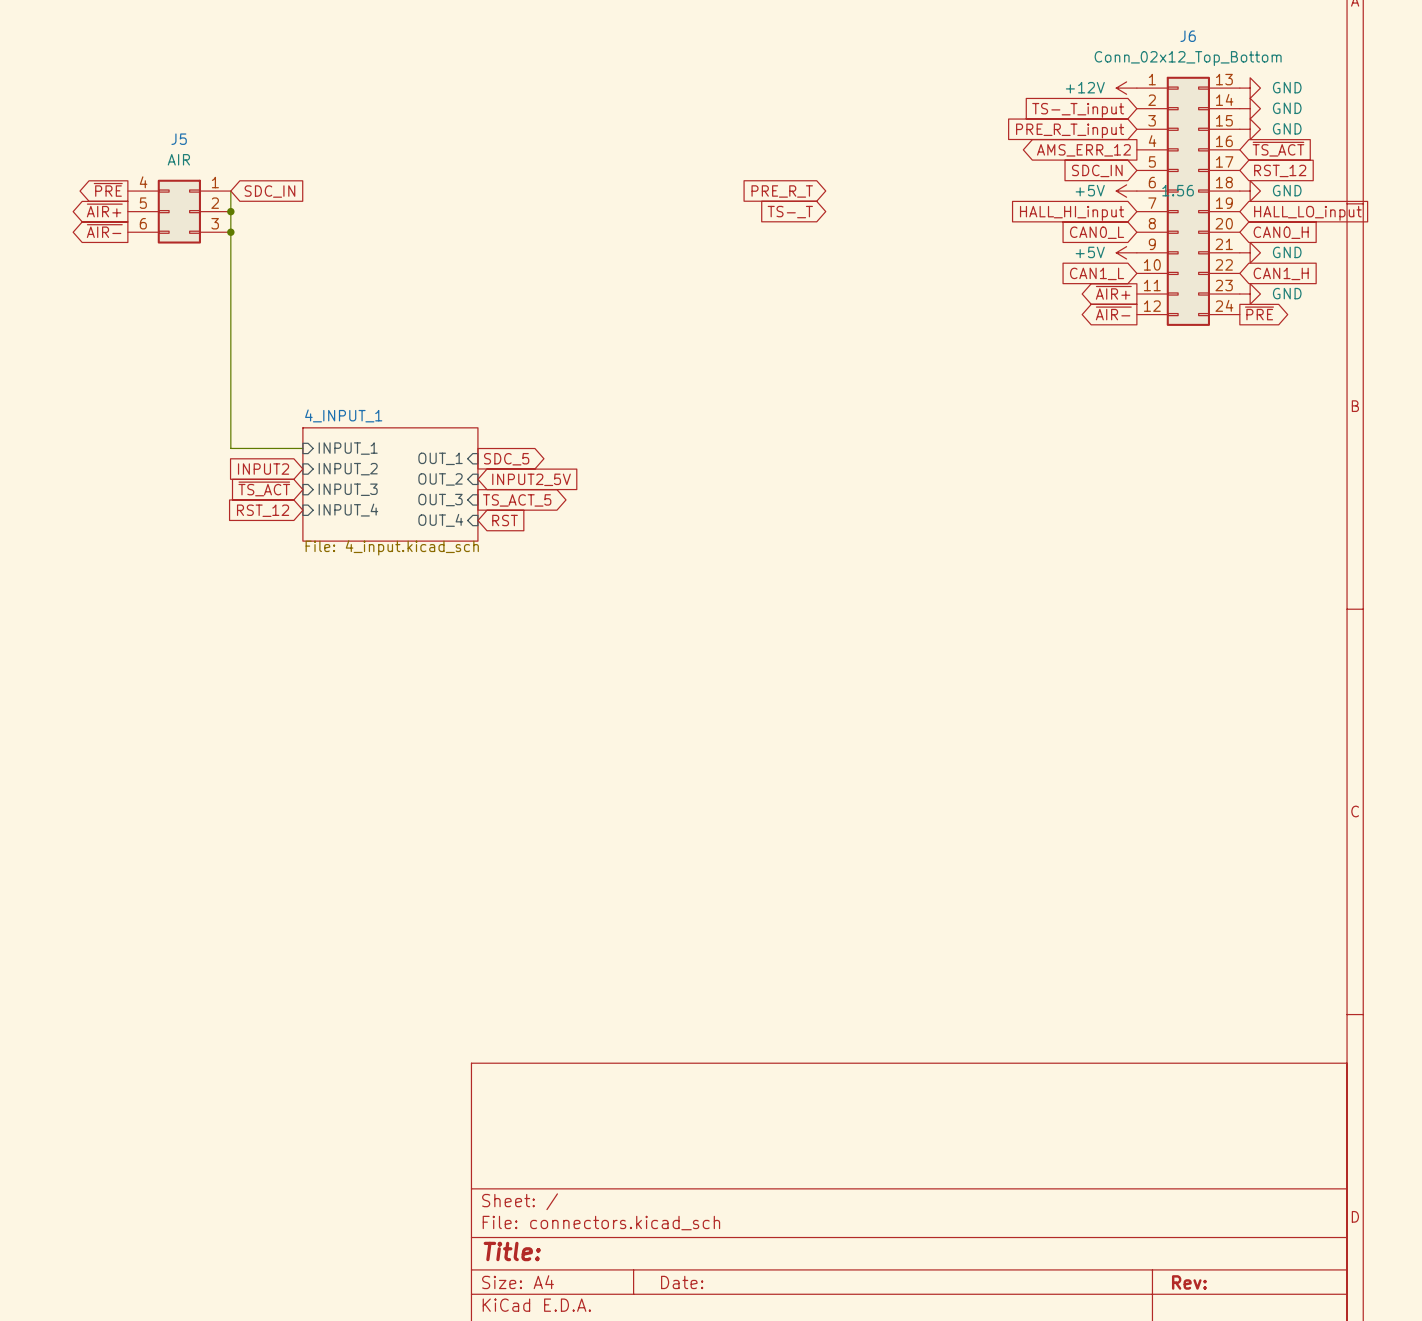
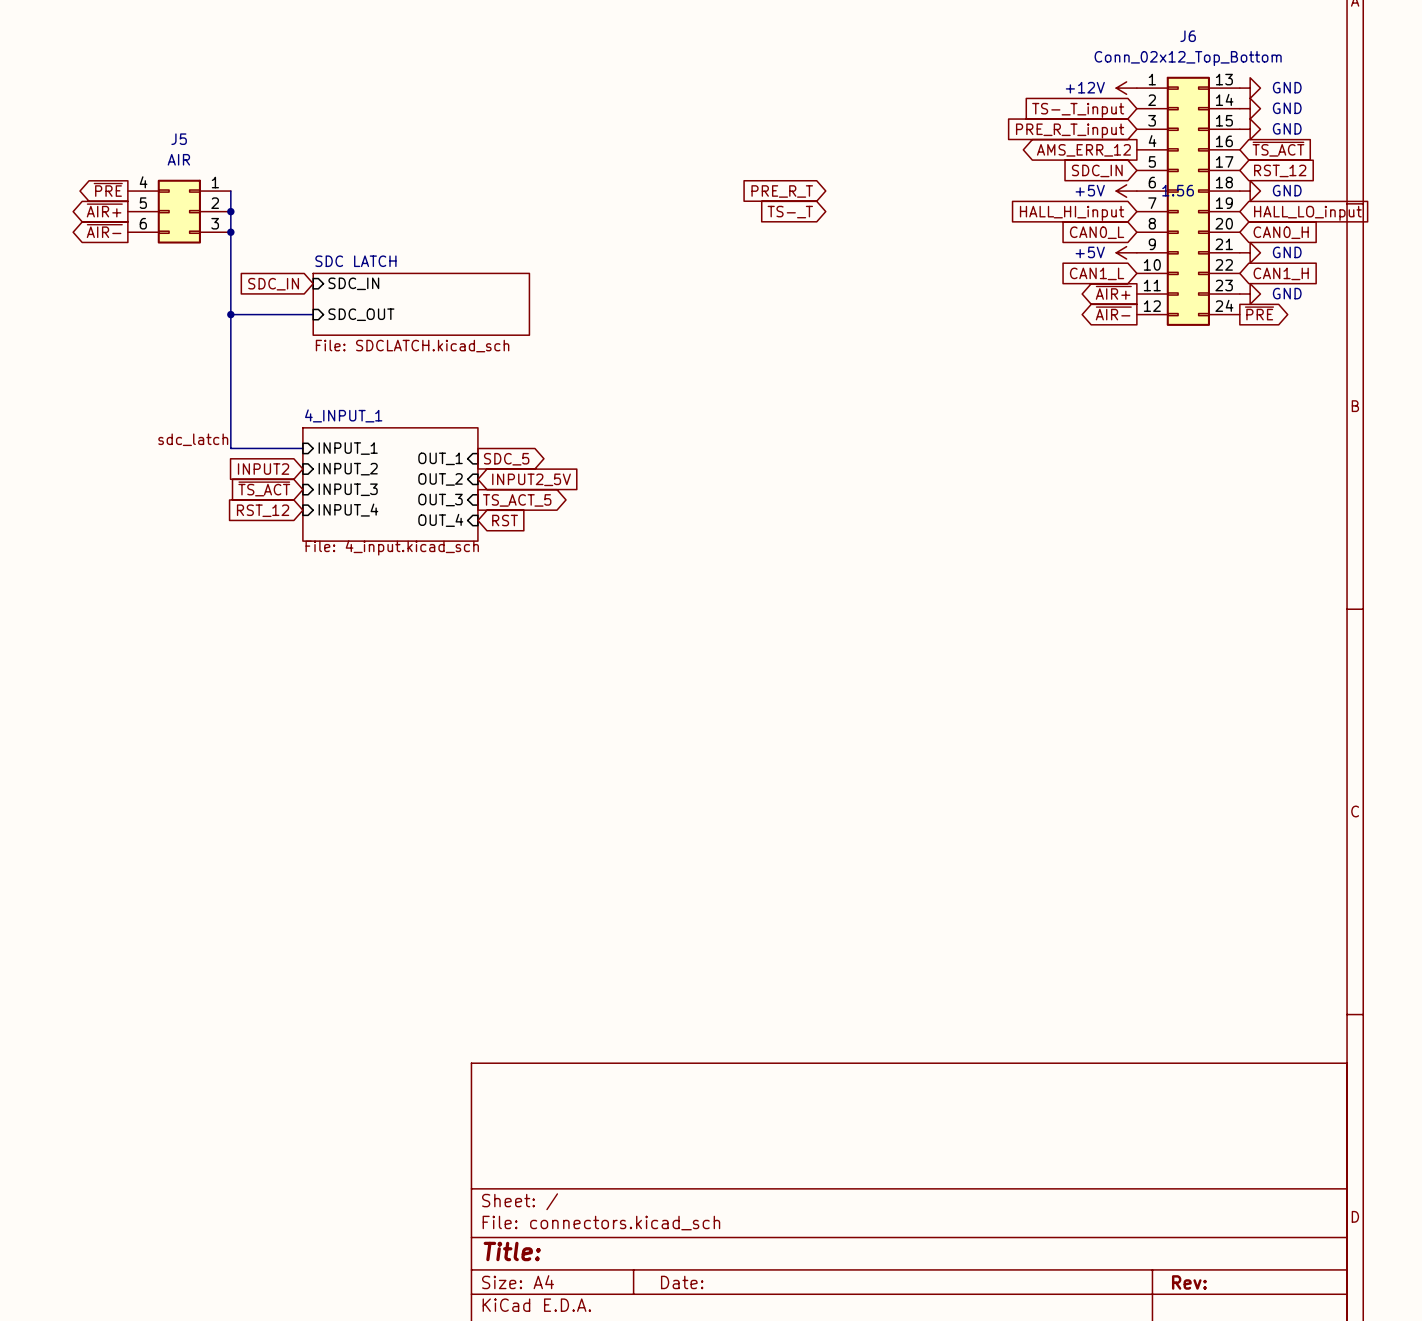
global label rotation: 0° (269, 191) -> 180° (273, 284)
global label position: SDC_IN (269, 191) -> SDC_IN (273, 284)
sheet pin: none -> SDC_IN (353, 283)
sheet SDC LATCH: none -> File: SDCLATCH.kicad_sch (421, 304)
wire: none -> (230, 314) (313, 314)
junction: none -> (230, 314)
sheet pin: none -> SDC_OUT (361, 314)
label: none -> sdc_latch (193, 439)

